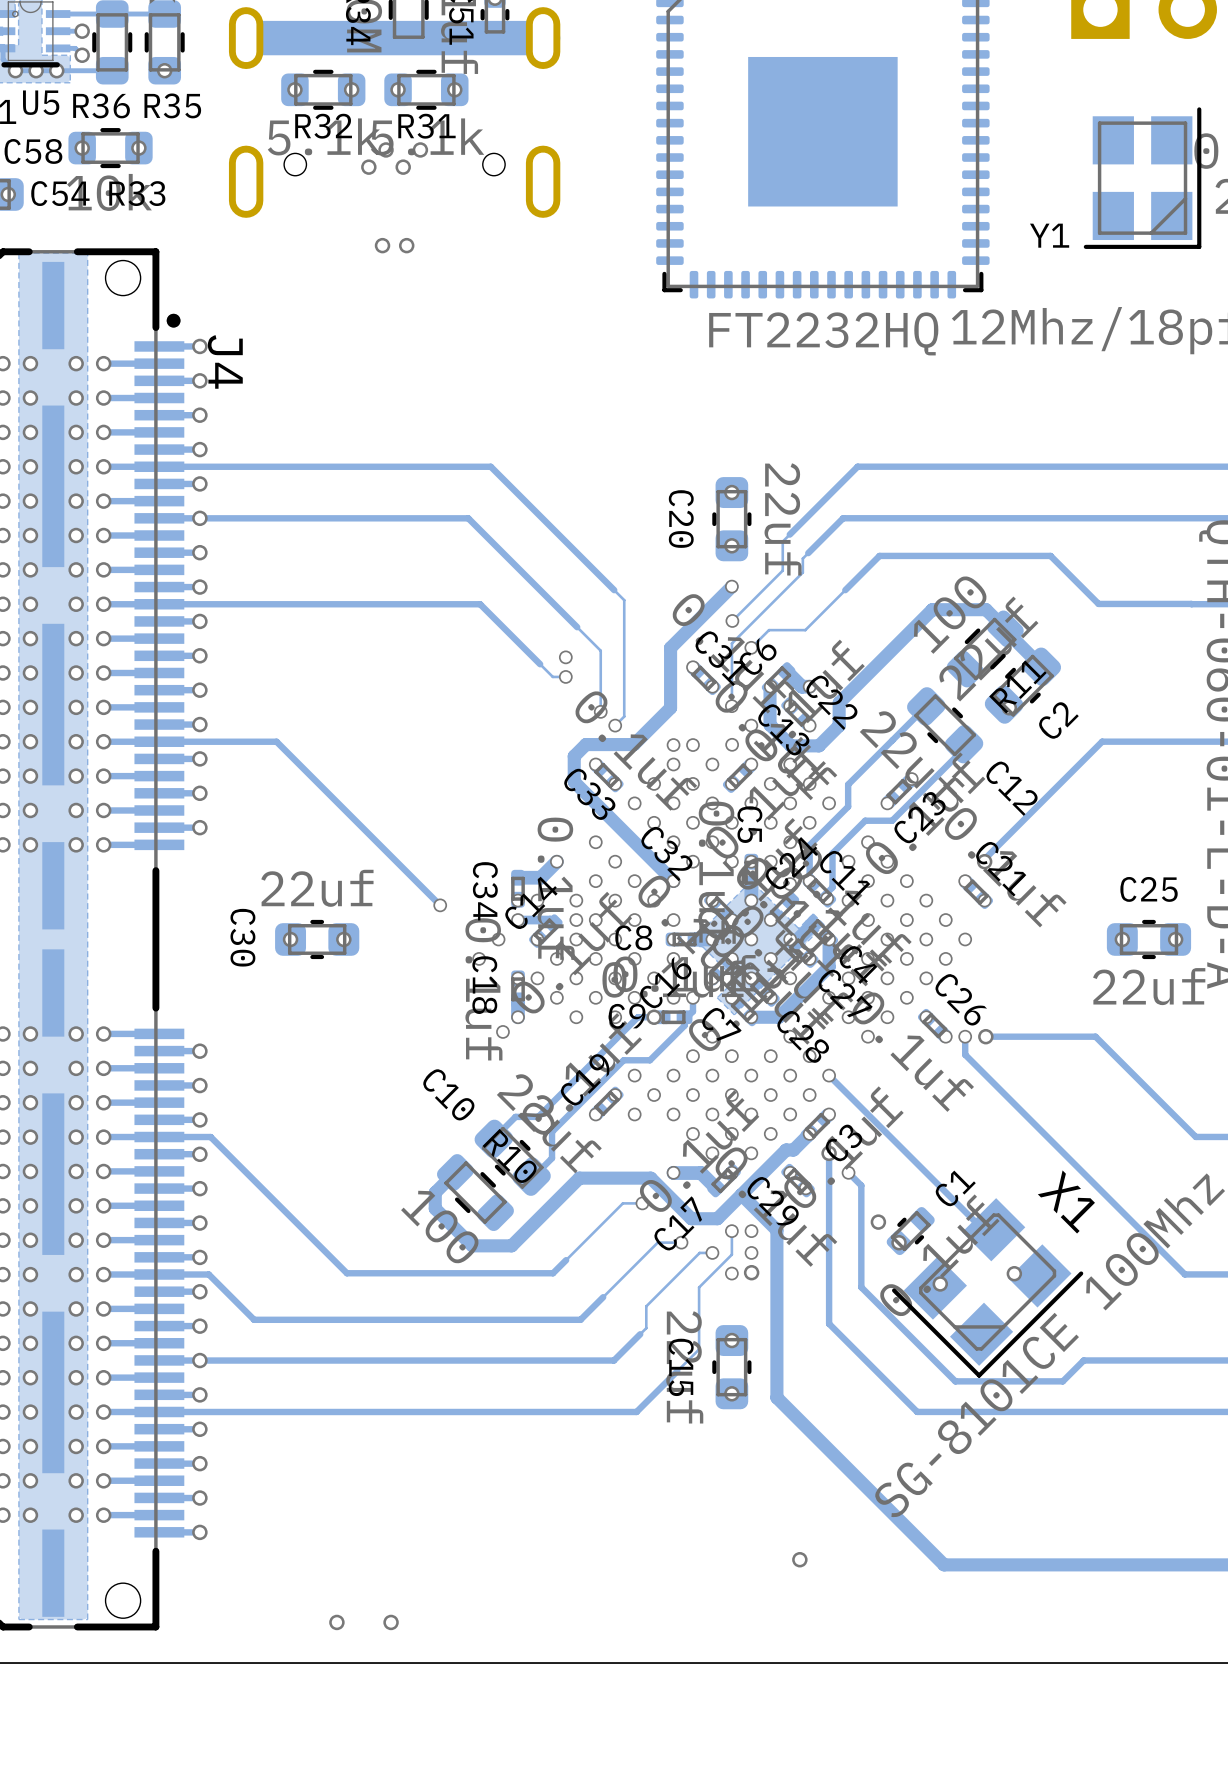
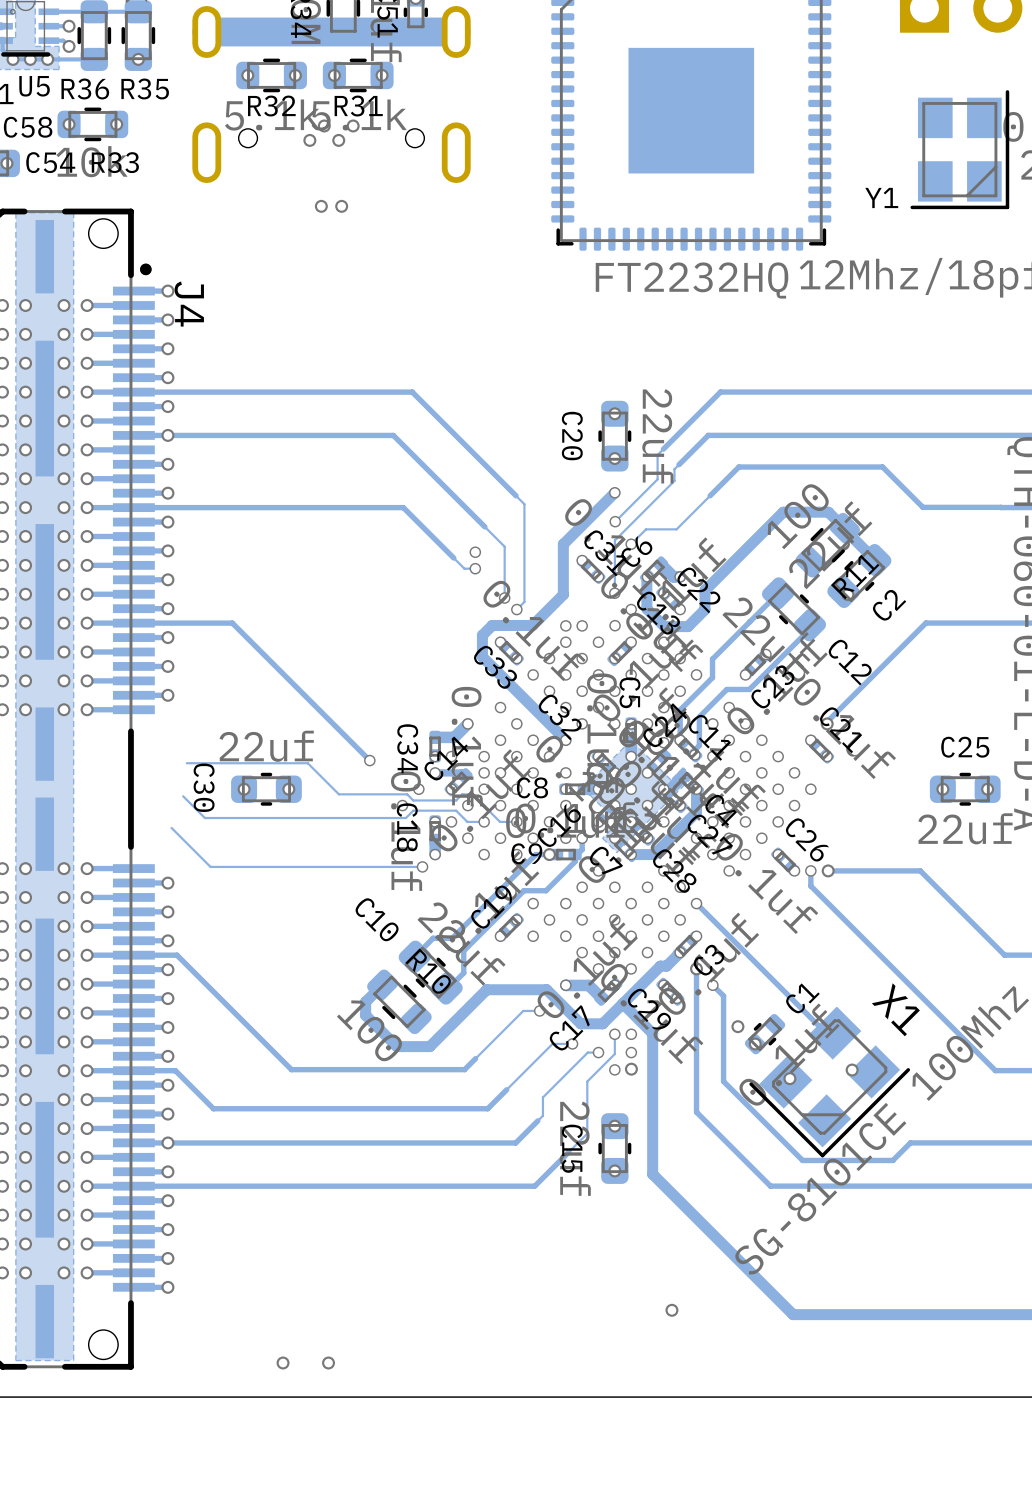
track: none -> (186, 763) (307, 763) (338, 794) (407, 794) (413, 800) (456, 800) (462, 794) (472, 794) (500, 821) (516, 821)
track: none -> (183, 796) (204, 818) (405, 818) (413, 810) (456, 810) (467, 821) (484, 821)
track: none -> (171, 827) (210, 866) (422, 866)

